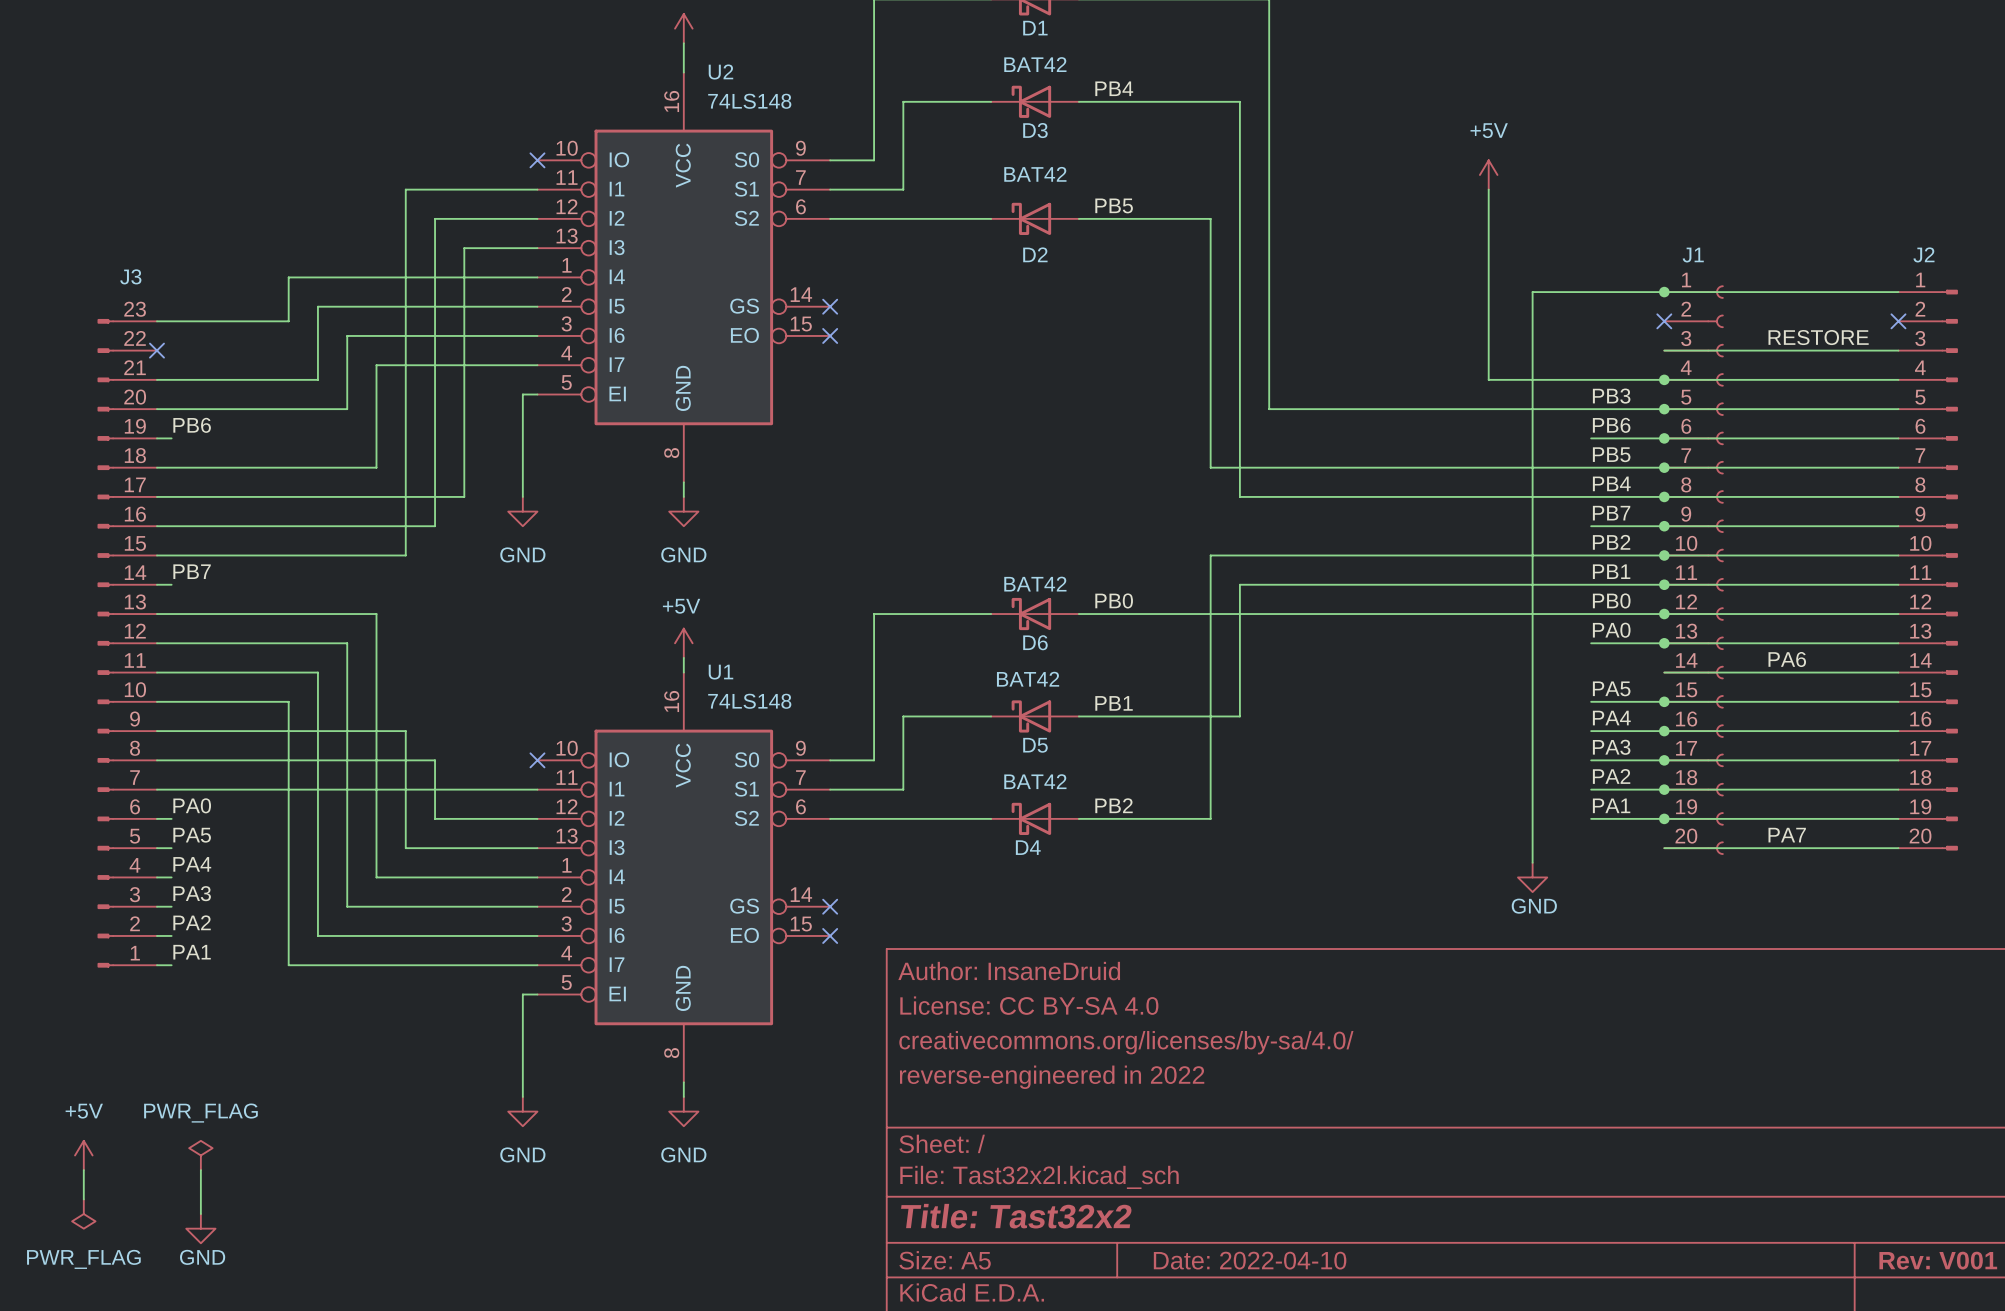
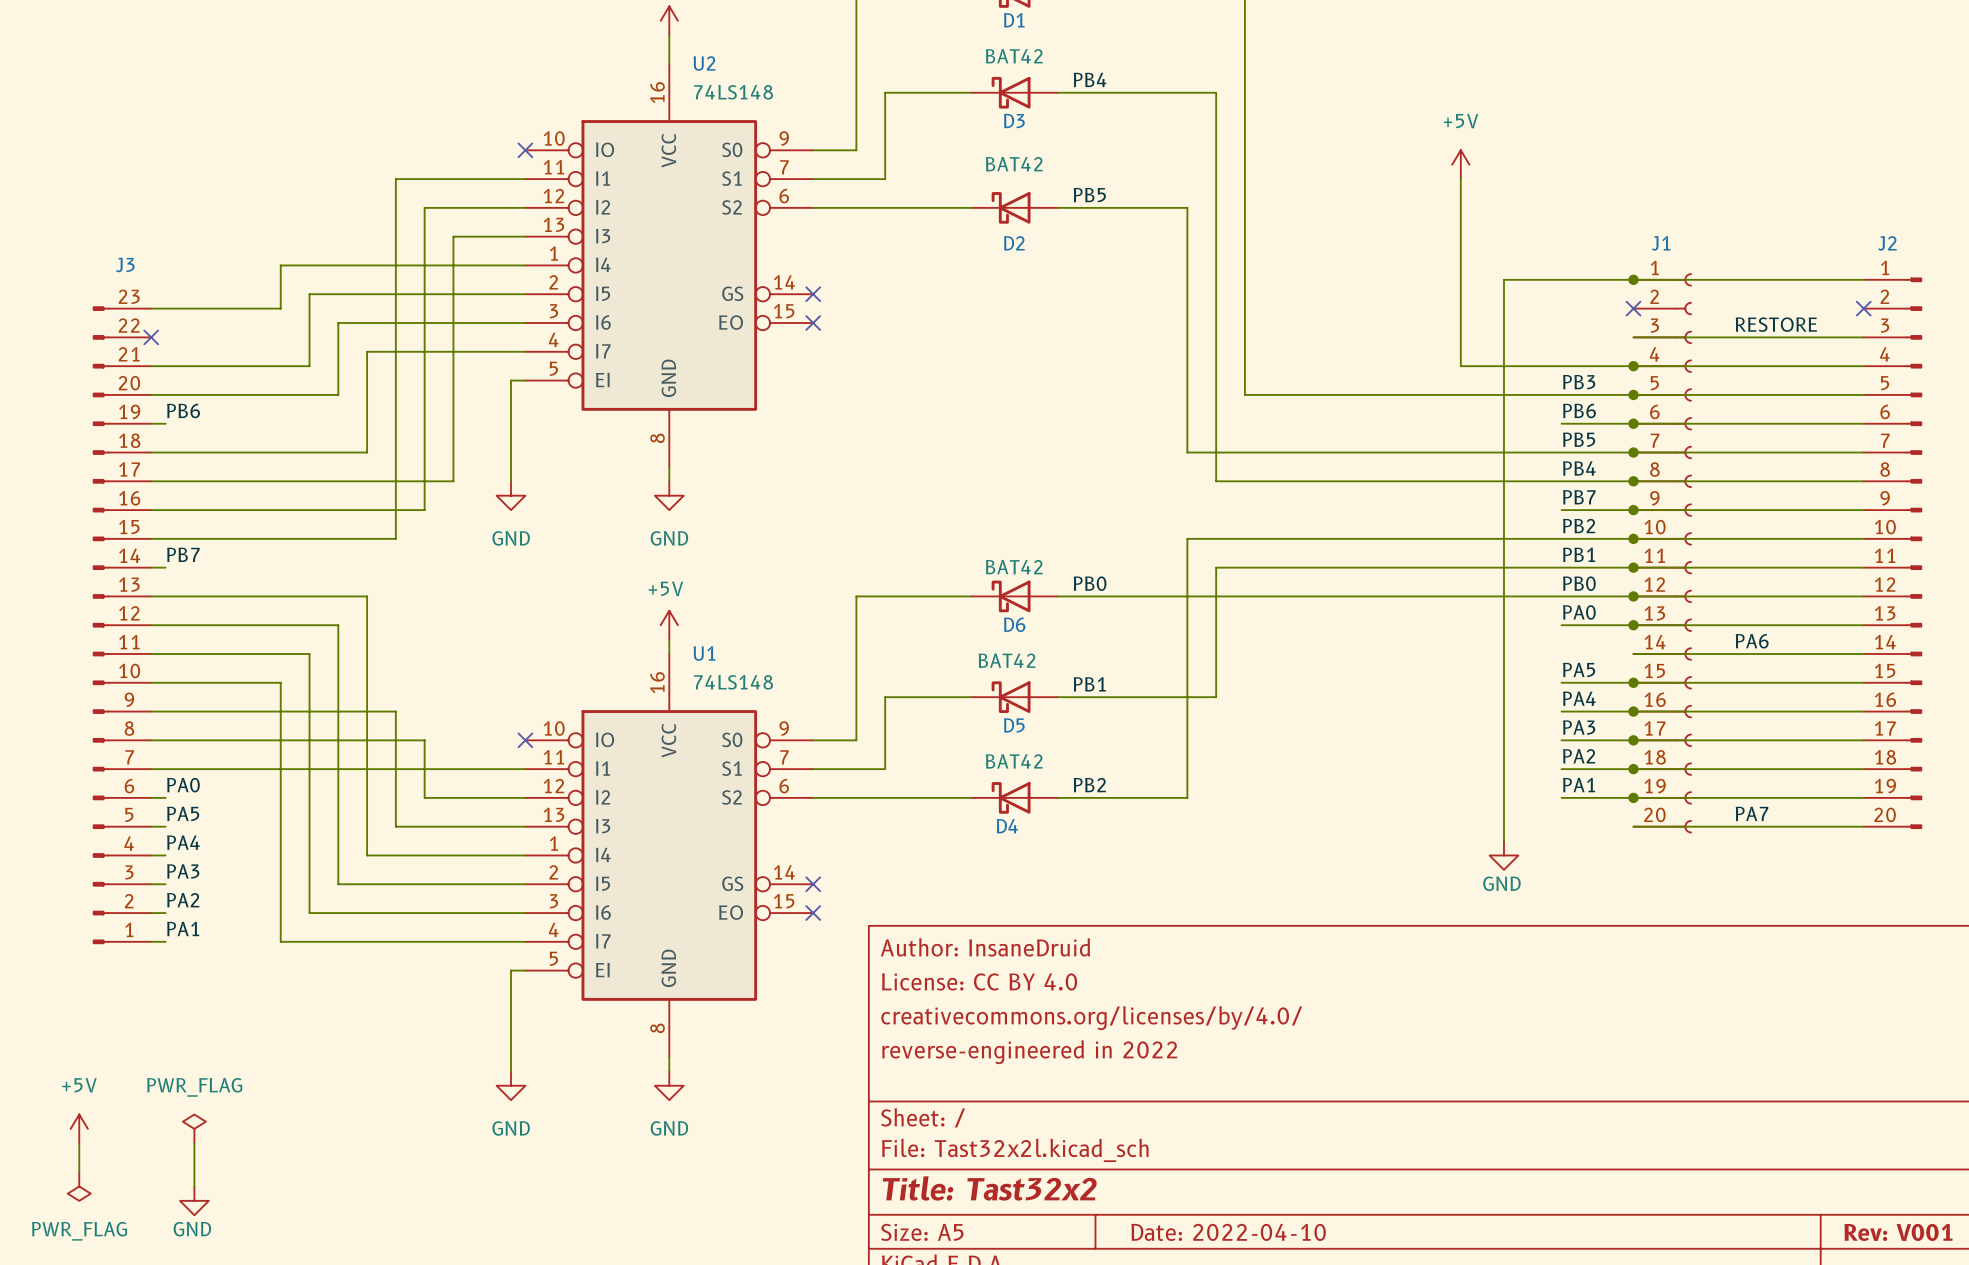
title block: License: CC BY-SA 4.0 (1029, 1005) -> License: CC BY 4.0 (979, 981)
title block: creativecommons.org/licenses/by-sa/4.0/ (1126, 1042) -> creativecommons.org/licenses/by/4.0/ (1091, 1018)

